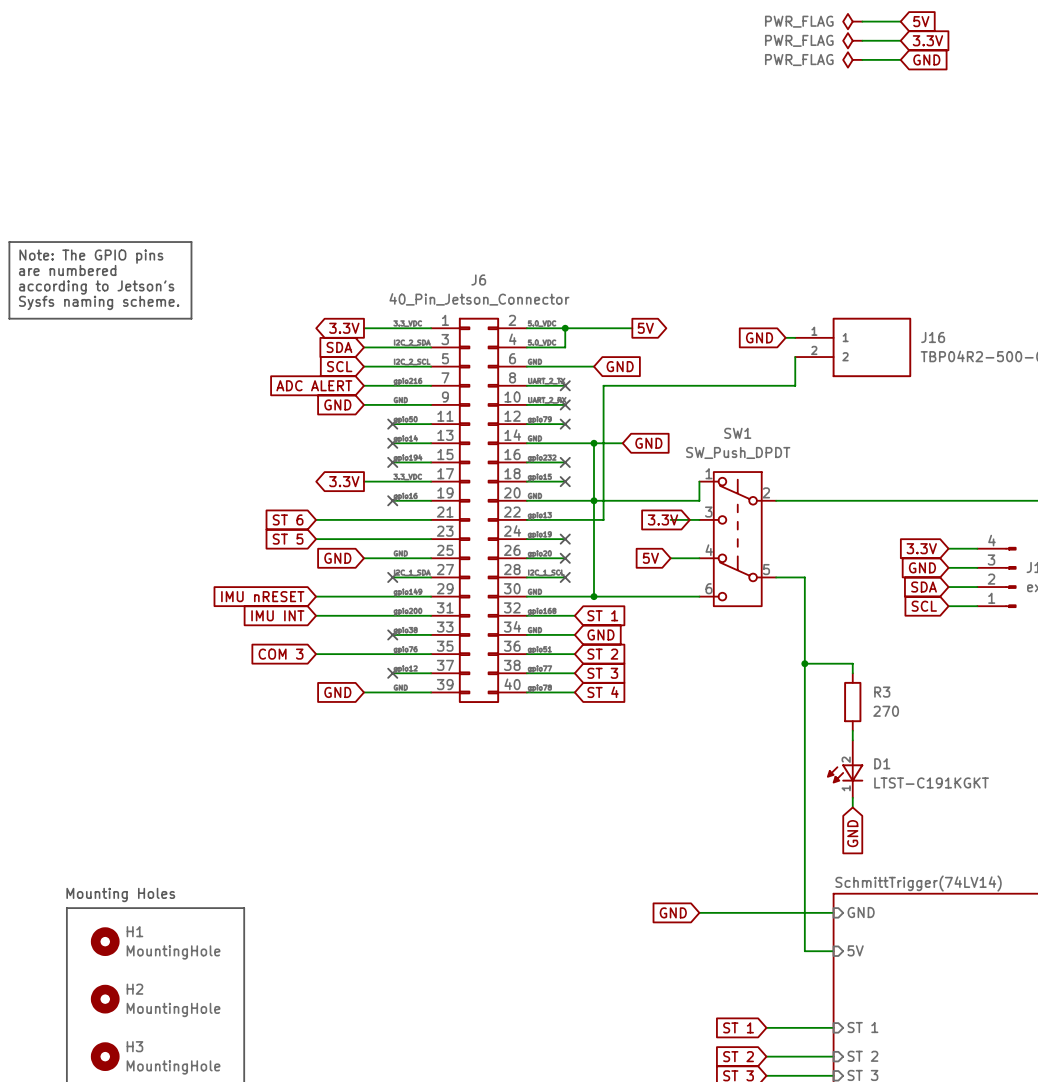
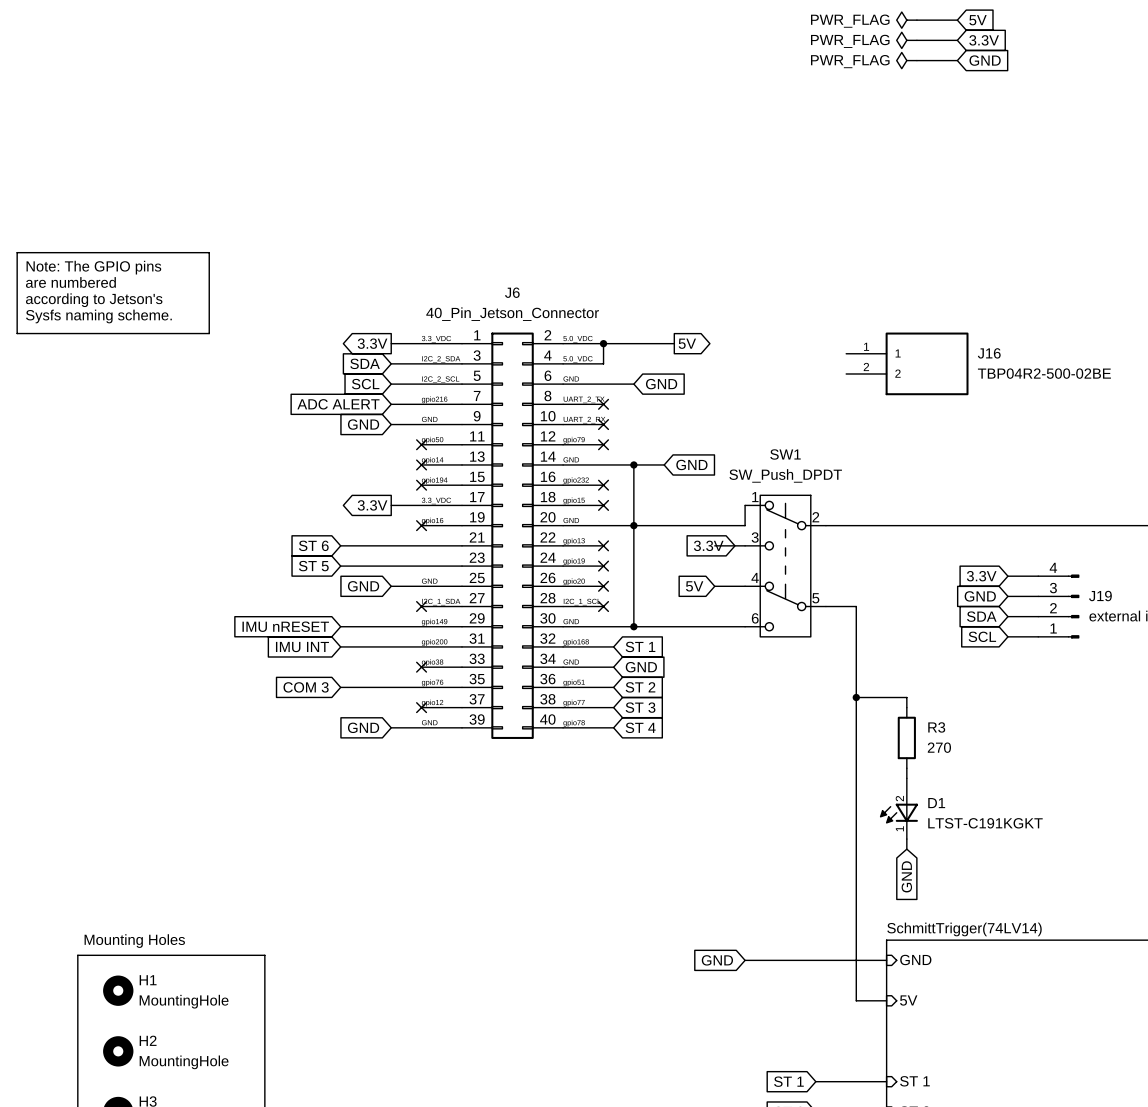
global label: GND (759, 337) -> none
wire: (785, 337) (795, 337) -> none
wire: (795, 357) (795, 385) (603, 385) (603, 519) (565, 519) -> none
no-connect mark: none -> (603, 545)

